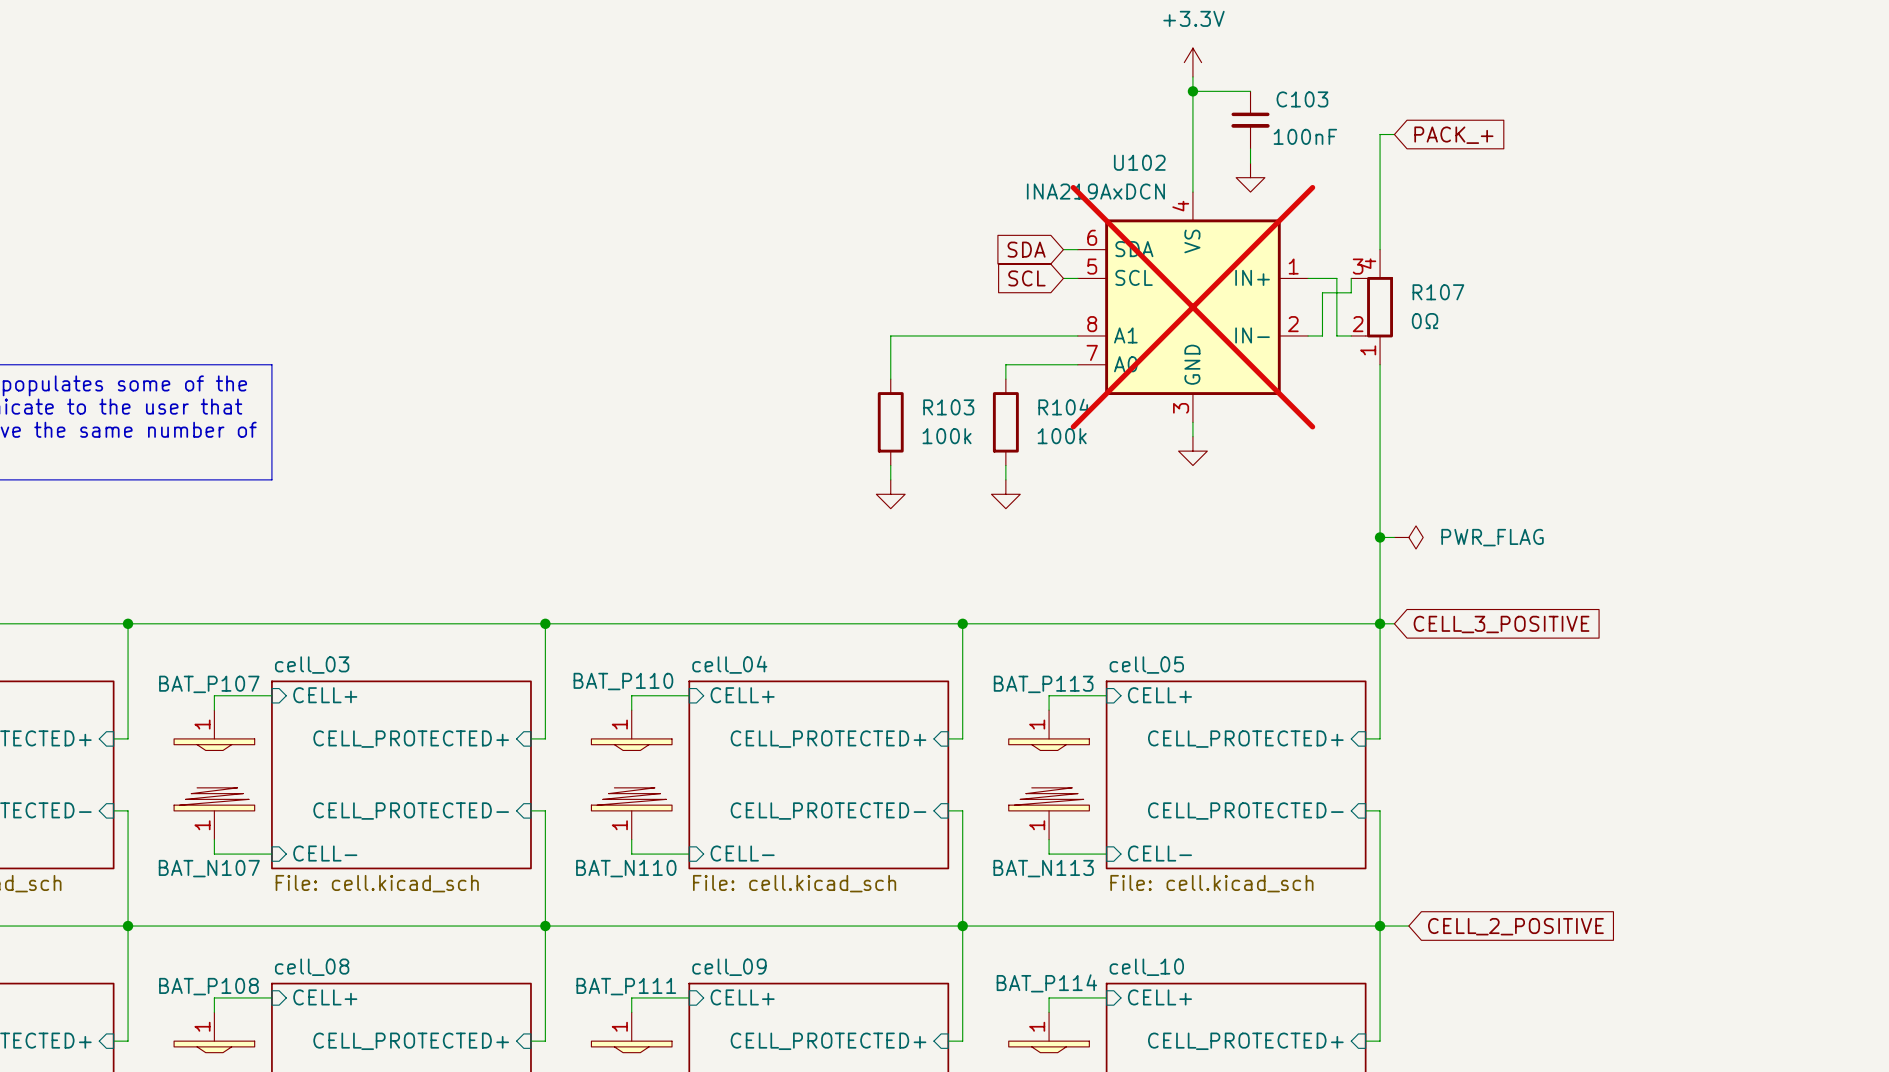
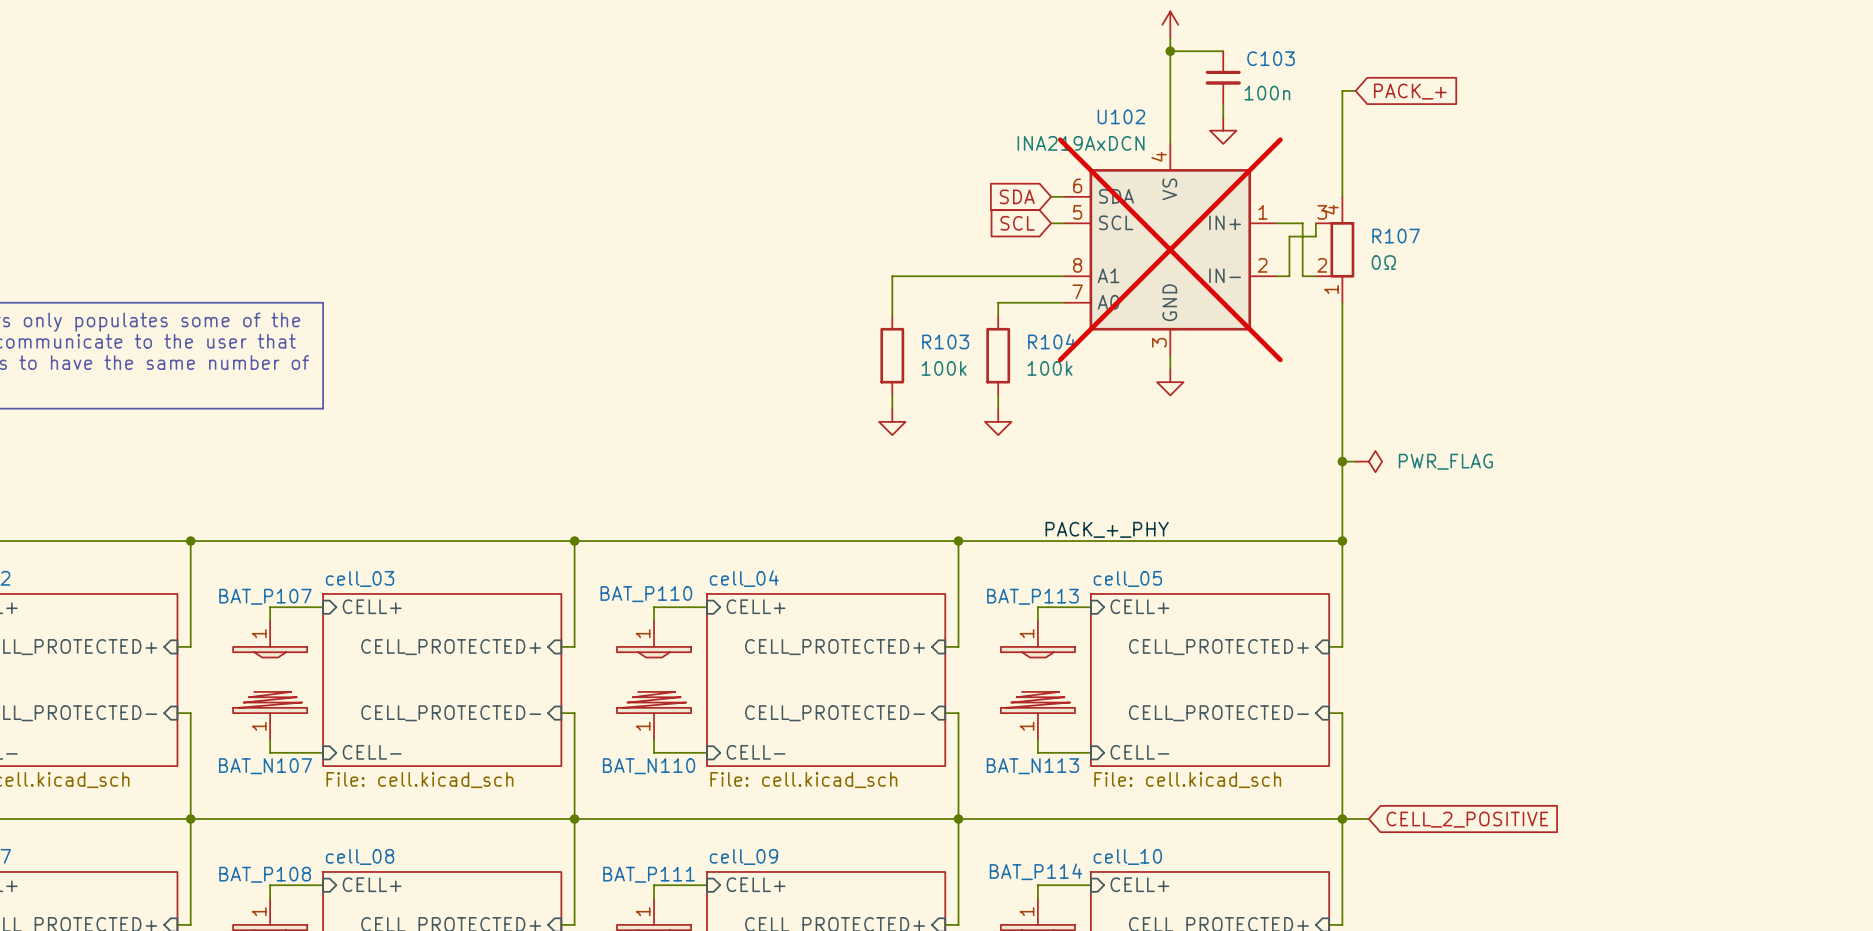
C103 value: 100nF (1305, 136) -> 100n (1267, 93)
label: none -> PACK_+_PHY (1107, 529)
wire: (1380, 623) (1394, 623) -> none
global label: CELL_3_POSITIVE (1501, 624) -> none

